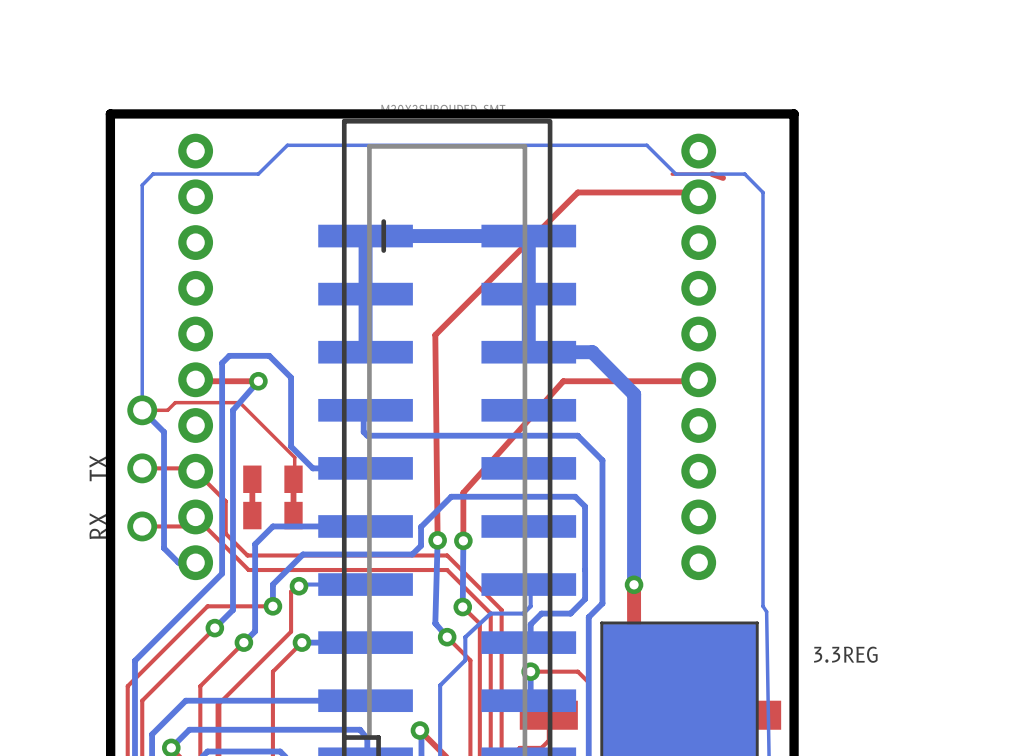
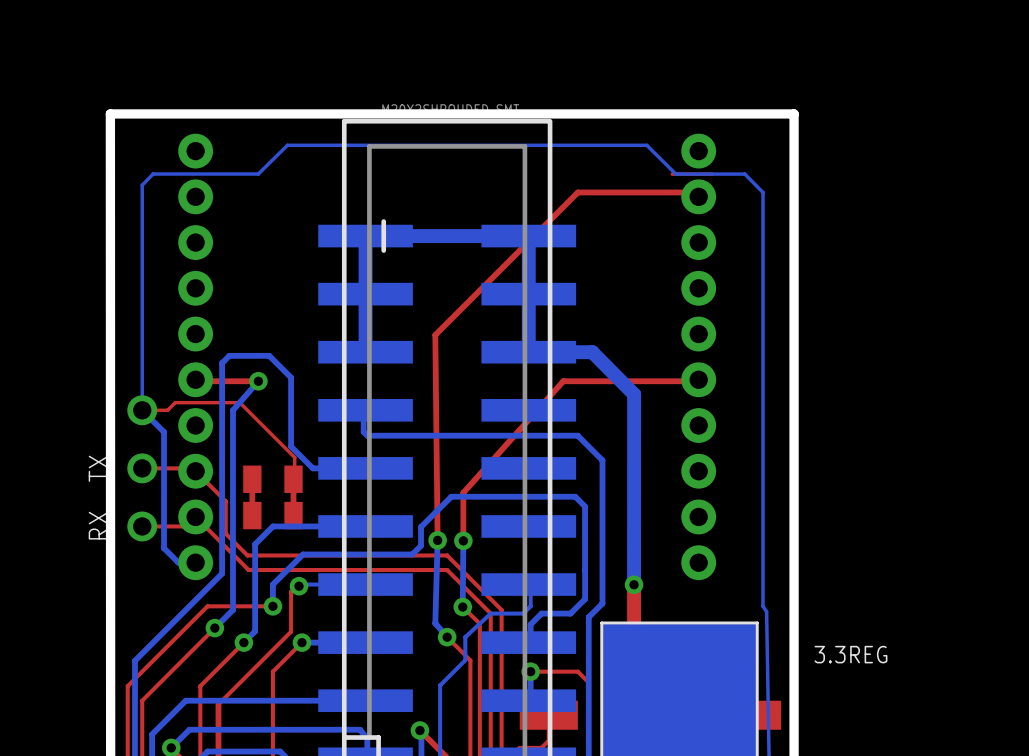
top track: (712, 174) (723, 177) -> none

